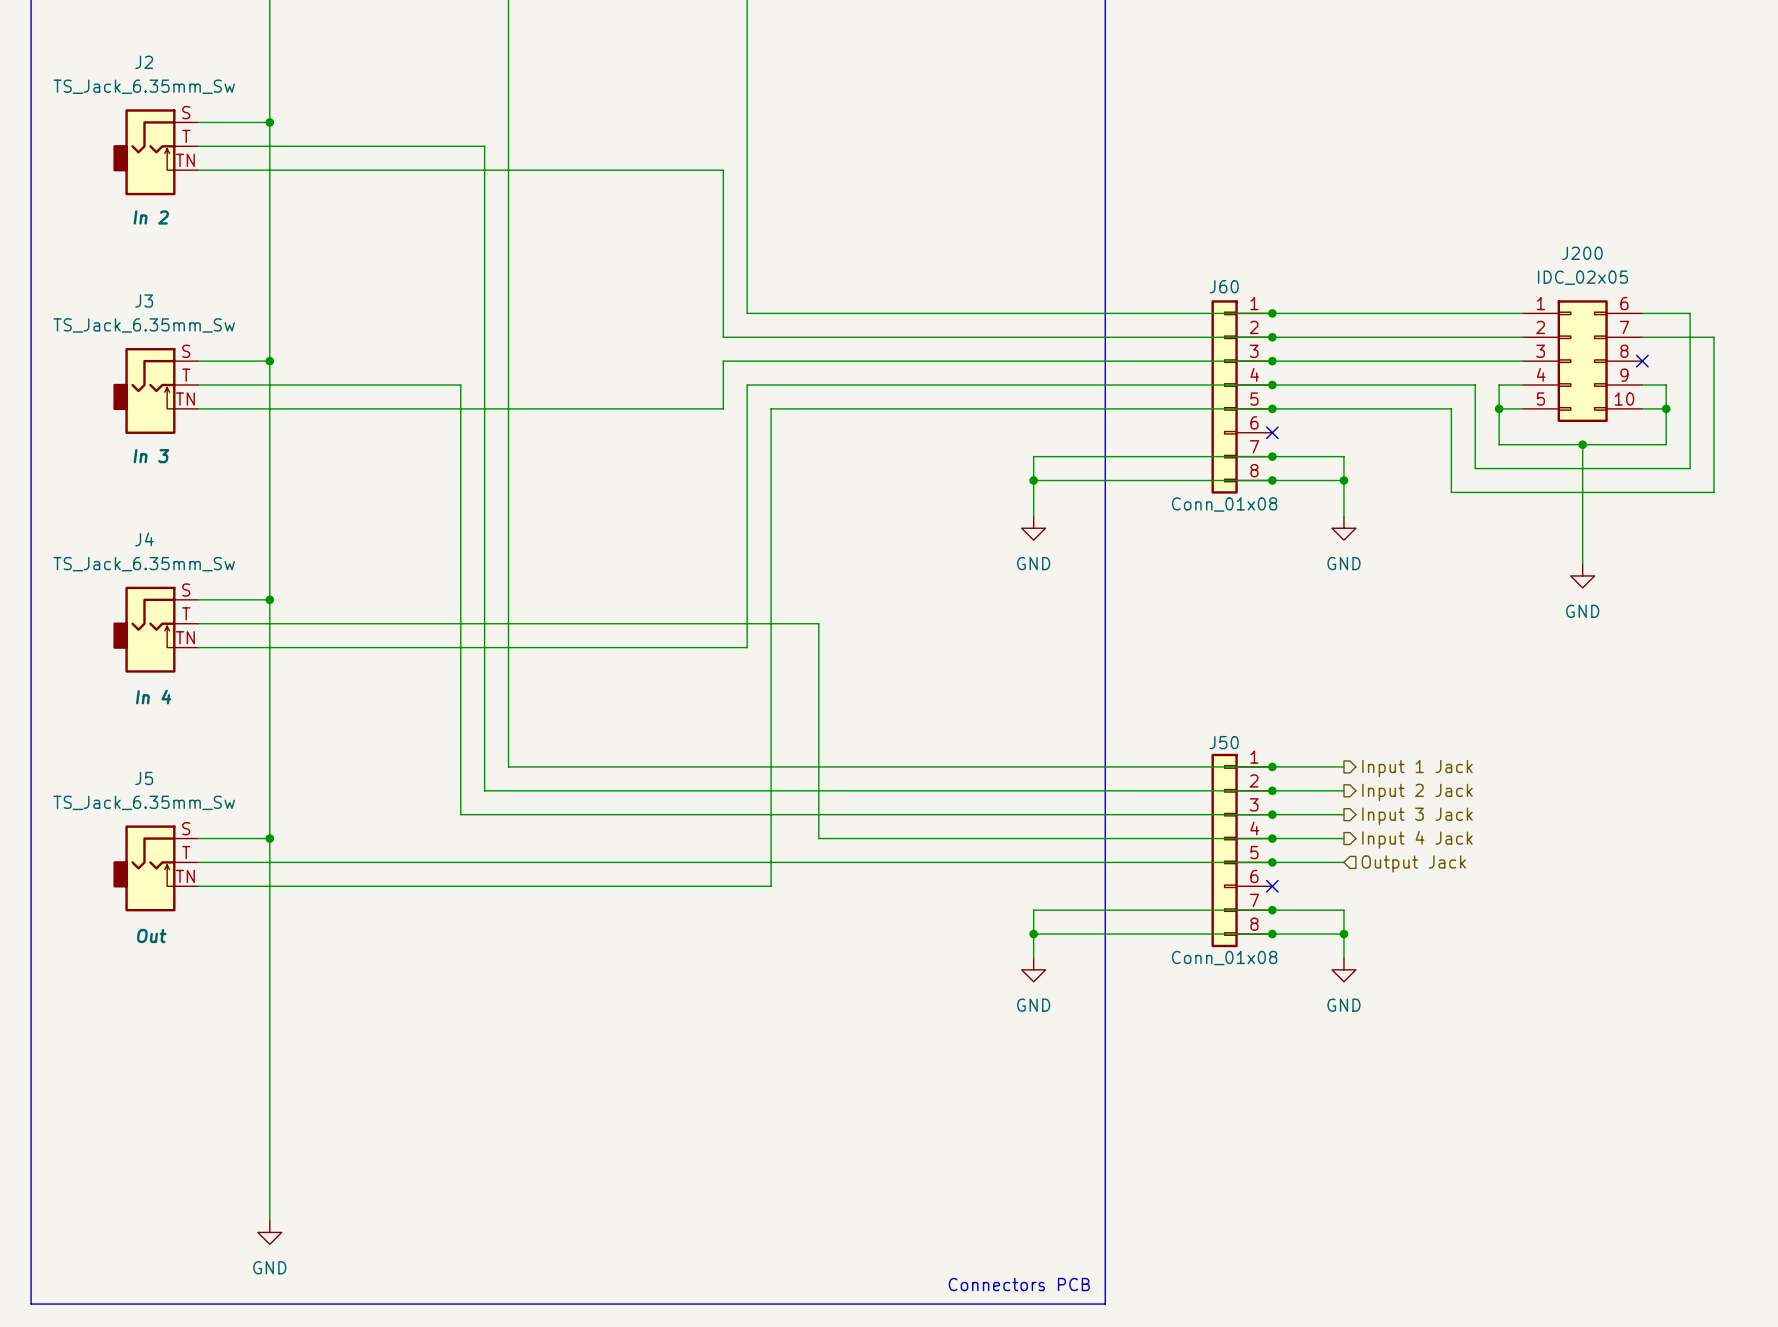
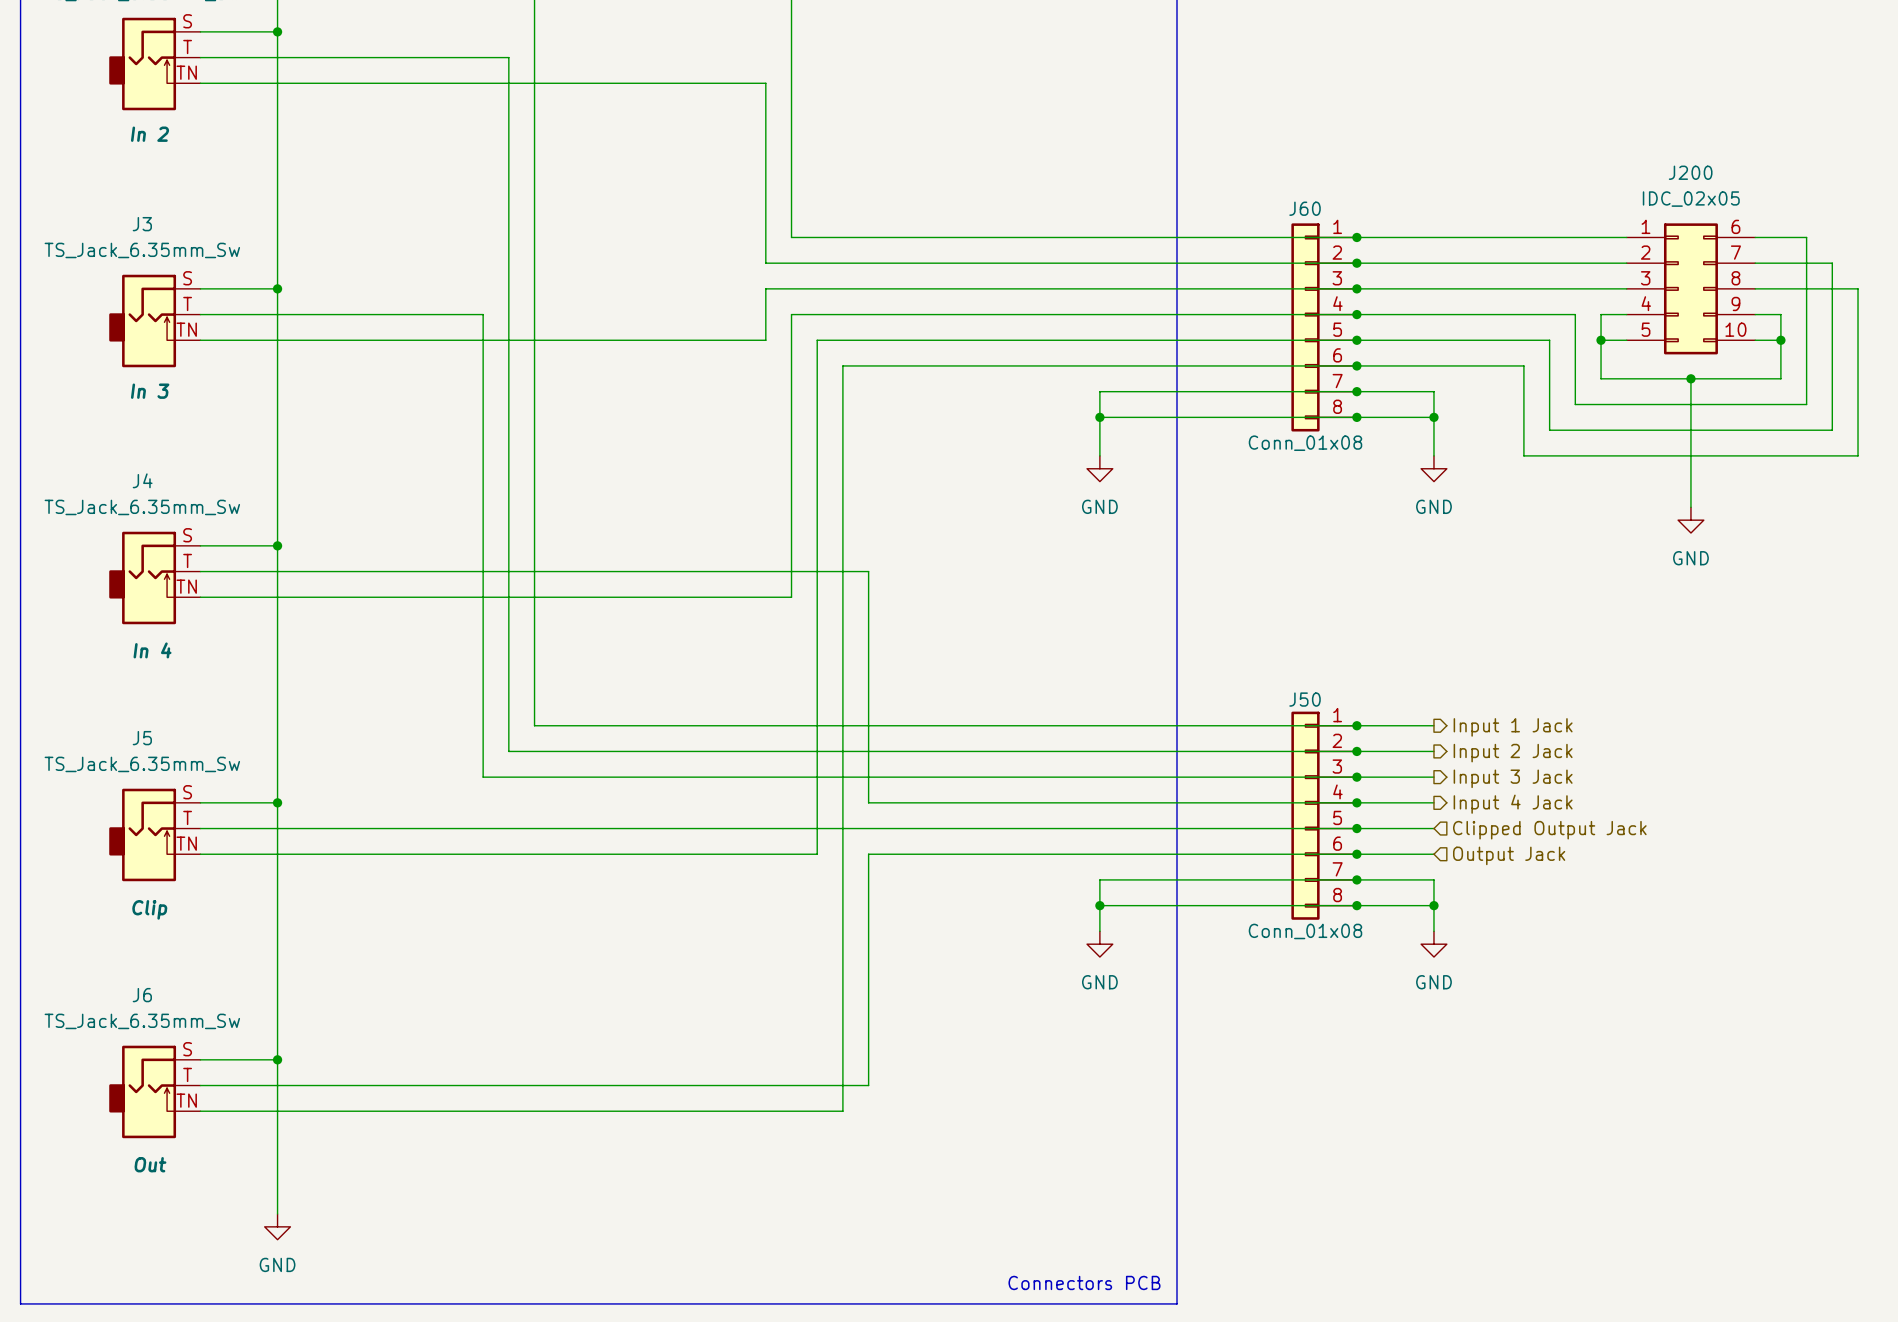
wire: none -> (1755, 288) (1858, 288) (1858, 455) (1523, 455) (1523, 365) (842, 365) (842, 1111) (200, 1111)
no-connect mark: (1642, 361) -> none
no-connect mark: (1272, 432) -> none
junction: none -> (1356, 365)
hierarchical label: Output Jack (1413, 863) -> Clipped Output Jack (1549, 830)
no-connect mark: (1272, 886) -> none
junction: none -> (1356, 854)
wire: none -> (1433, 854) (868, 854) (868, 1085) (200, 1085)
hierarchical label: none -> Output Jack (1509, 855)
J5 text: Out (151, 935) -> Clip (149, 909)
wire: none -> (200, 1059) (277, 1059)
junction: none -> (277, 1059)
J6: none -> TS_Jack_6.35mm_Sw (154, 1091)

